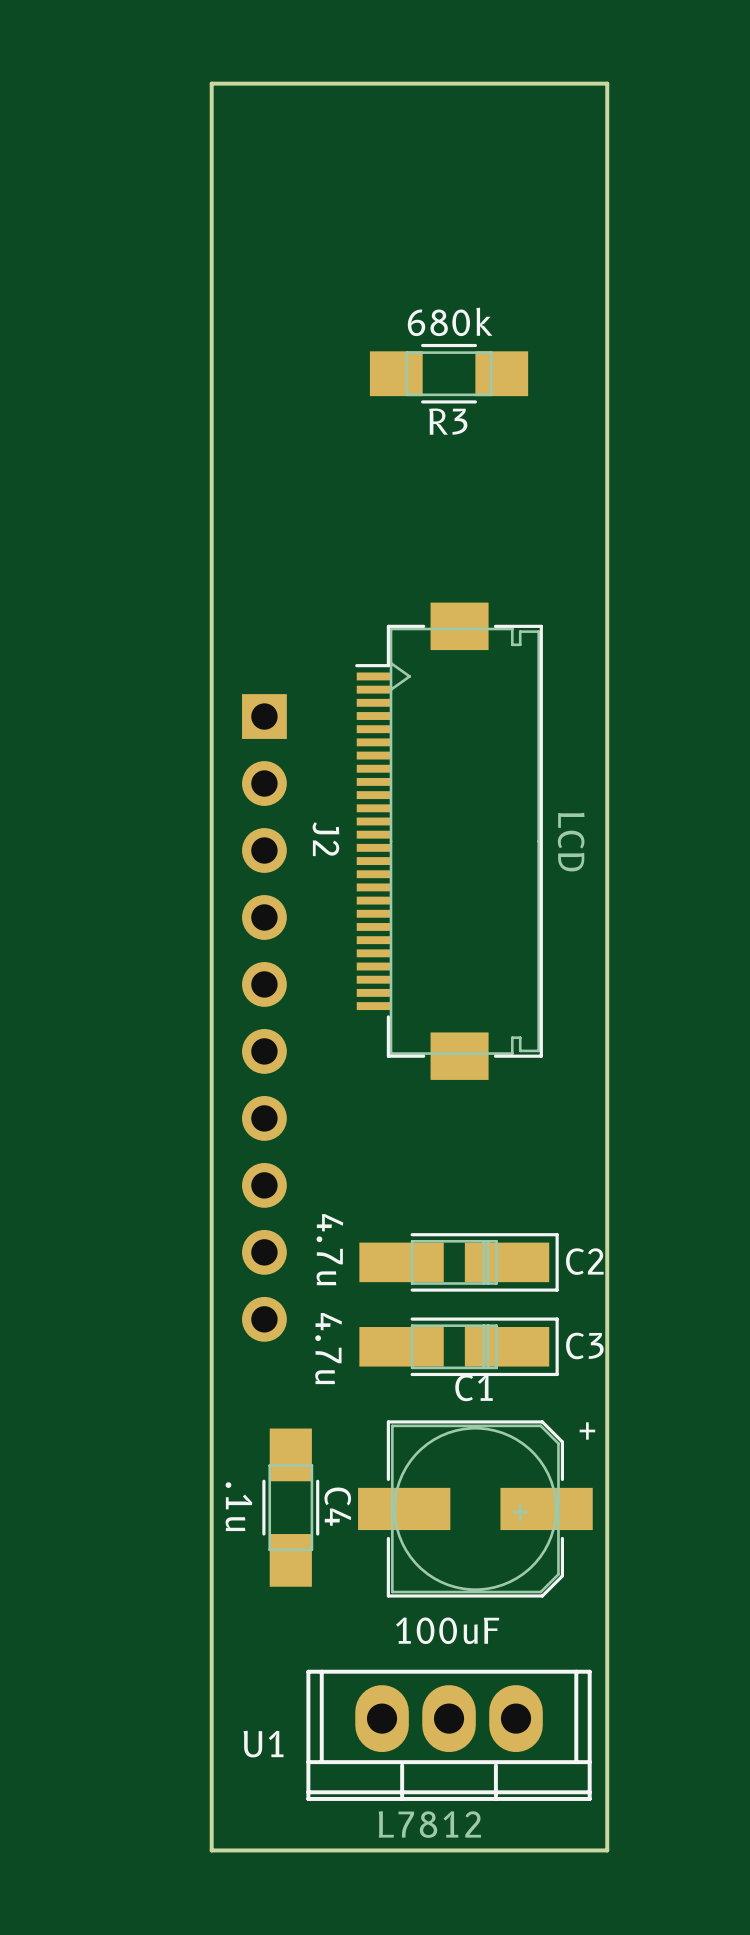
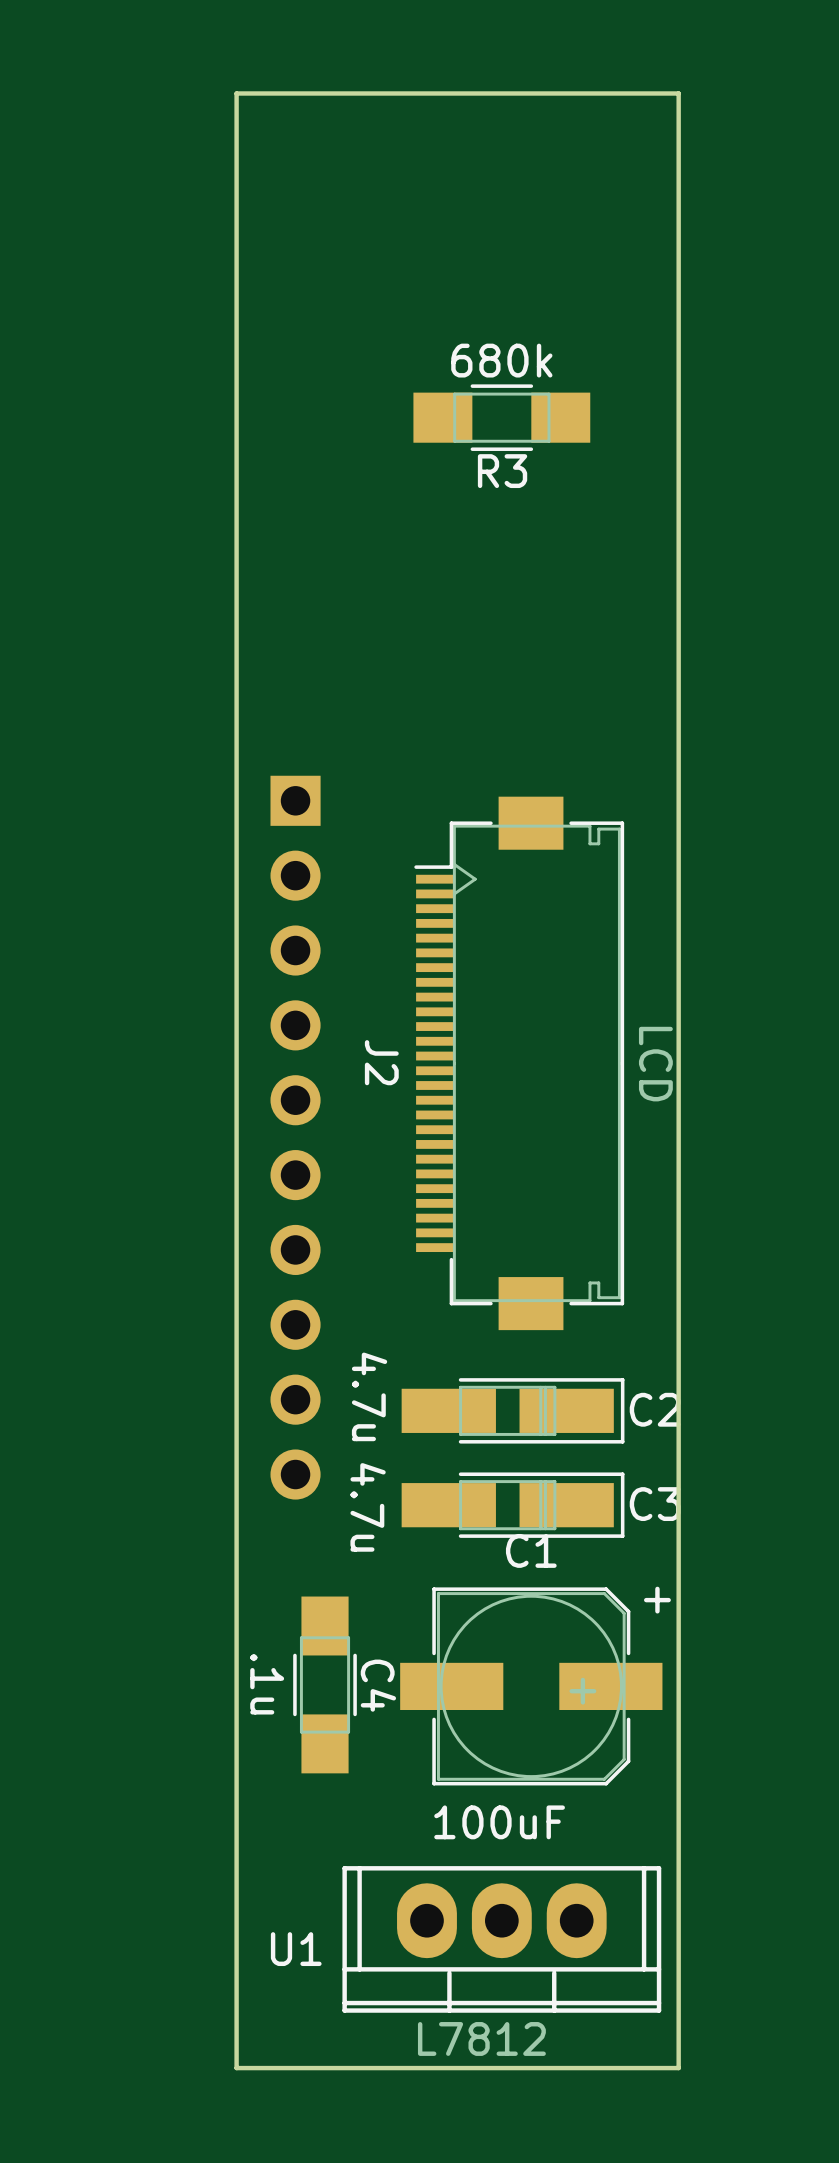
J2 position: (449, 841) -> (519, 1063)

